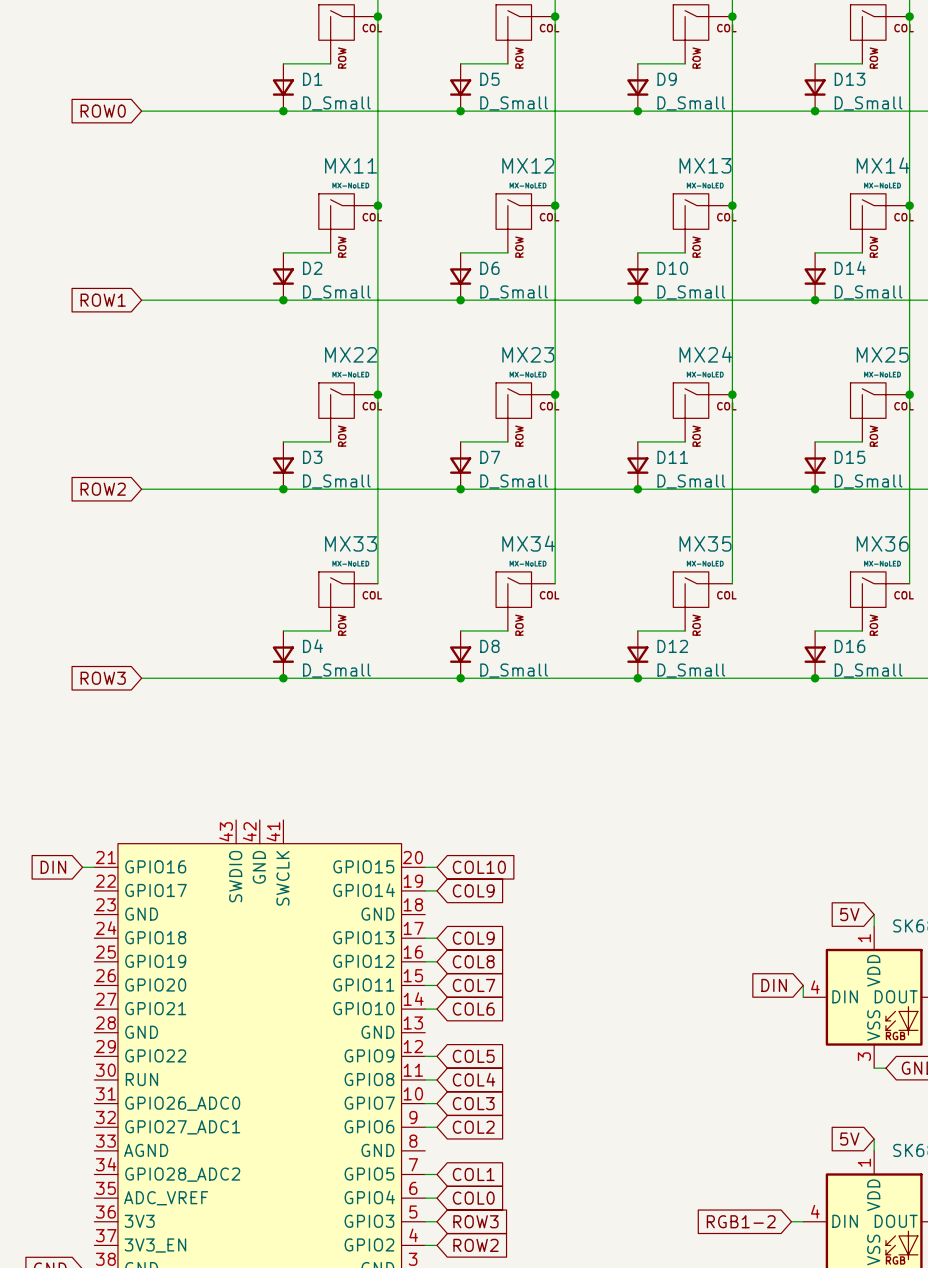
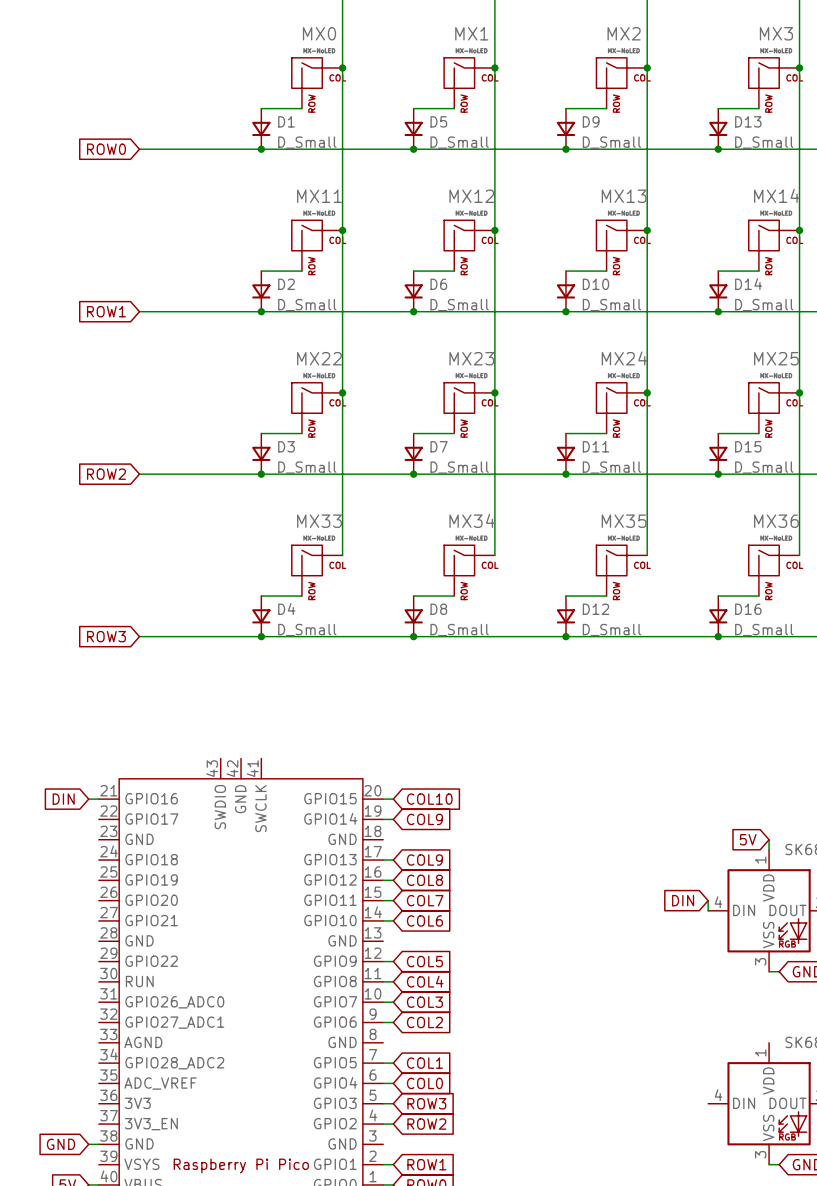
global label: 5V (849, 1139) -> none
wire: (874, 1139) (874, 1150) -> none
global label: RGB1-2 (741, 1221) -> none
wire: (791, 1221) (803, 1221) -> none

